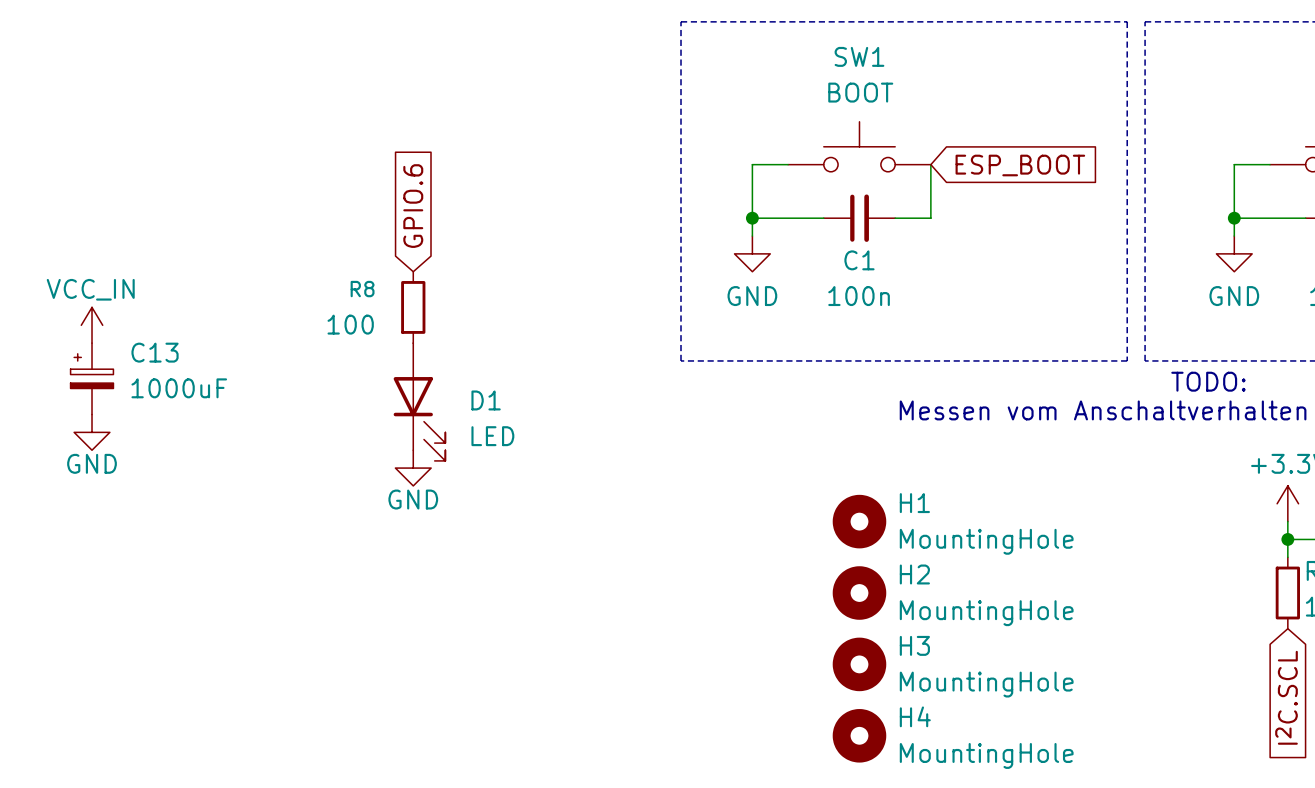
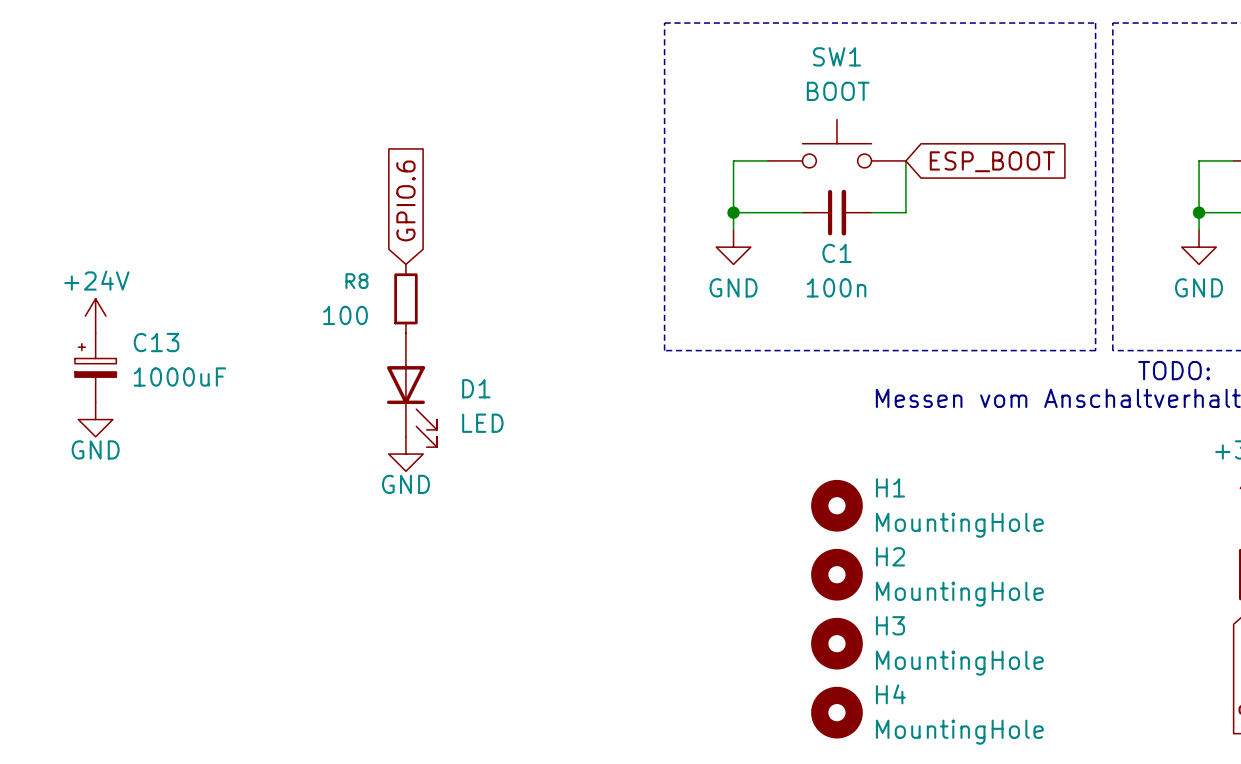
power symbol: VCC_IN (92, 325) -> +24V (95, 316)

